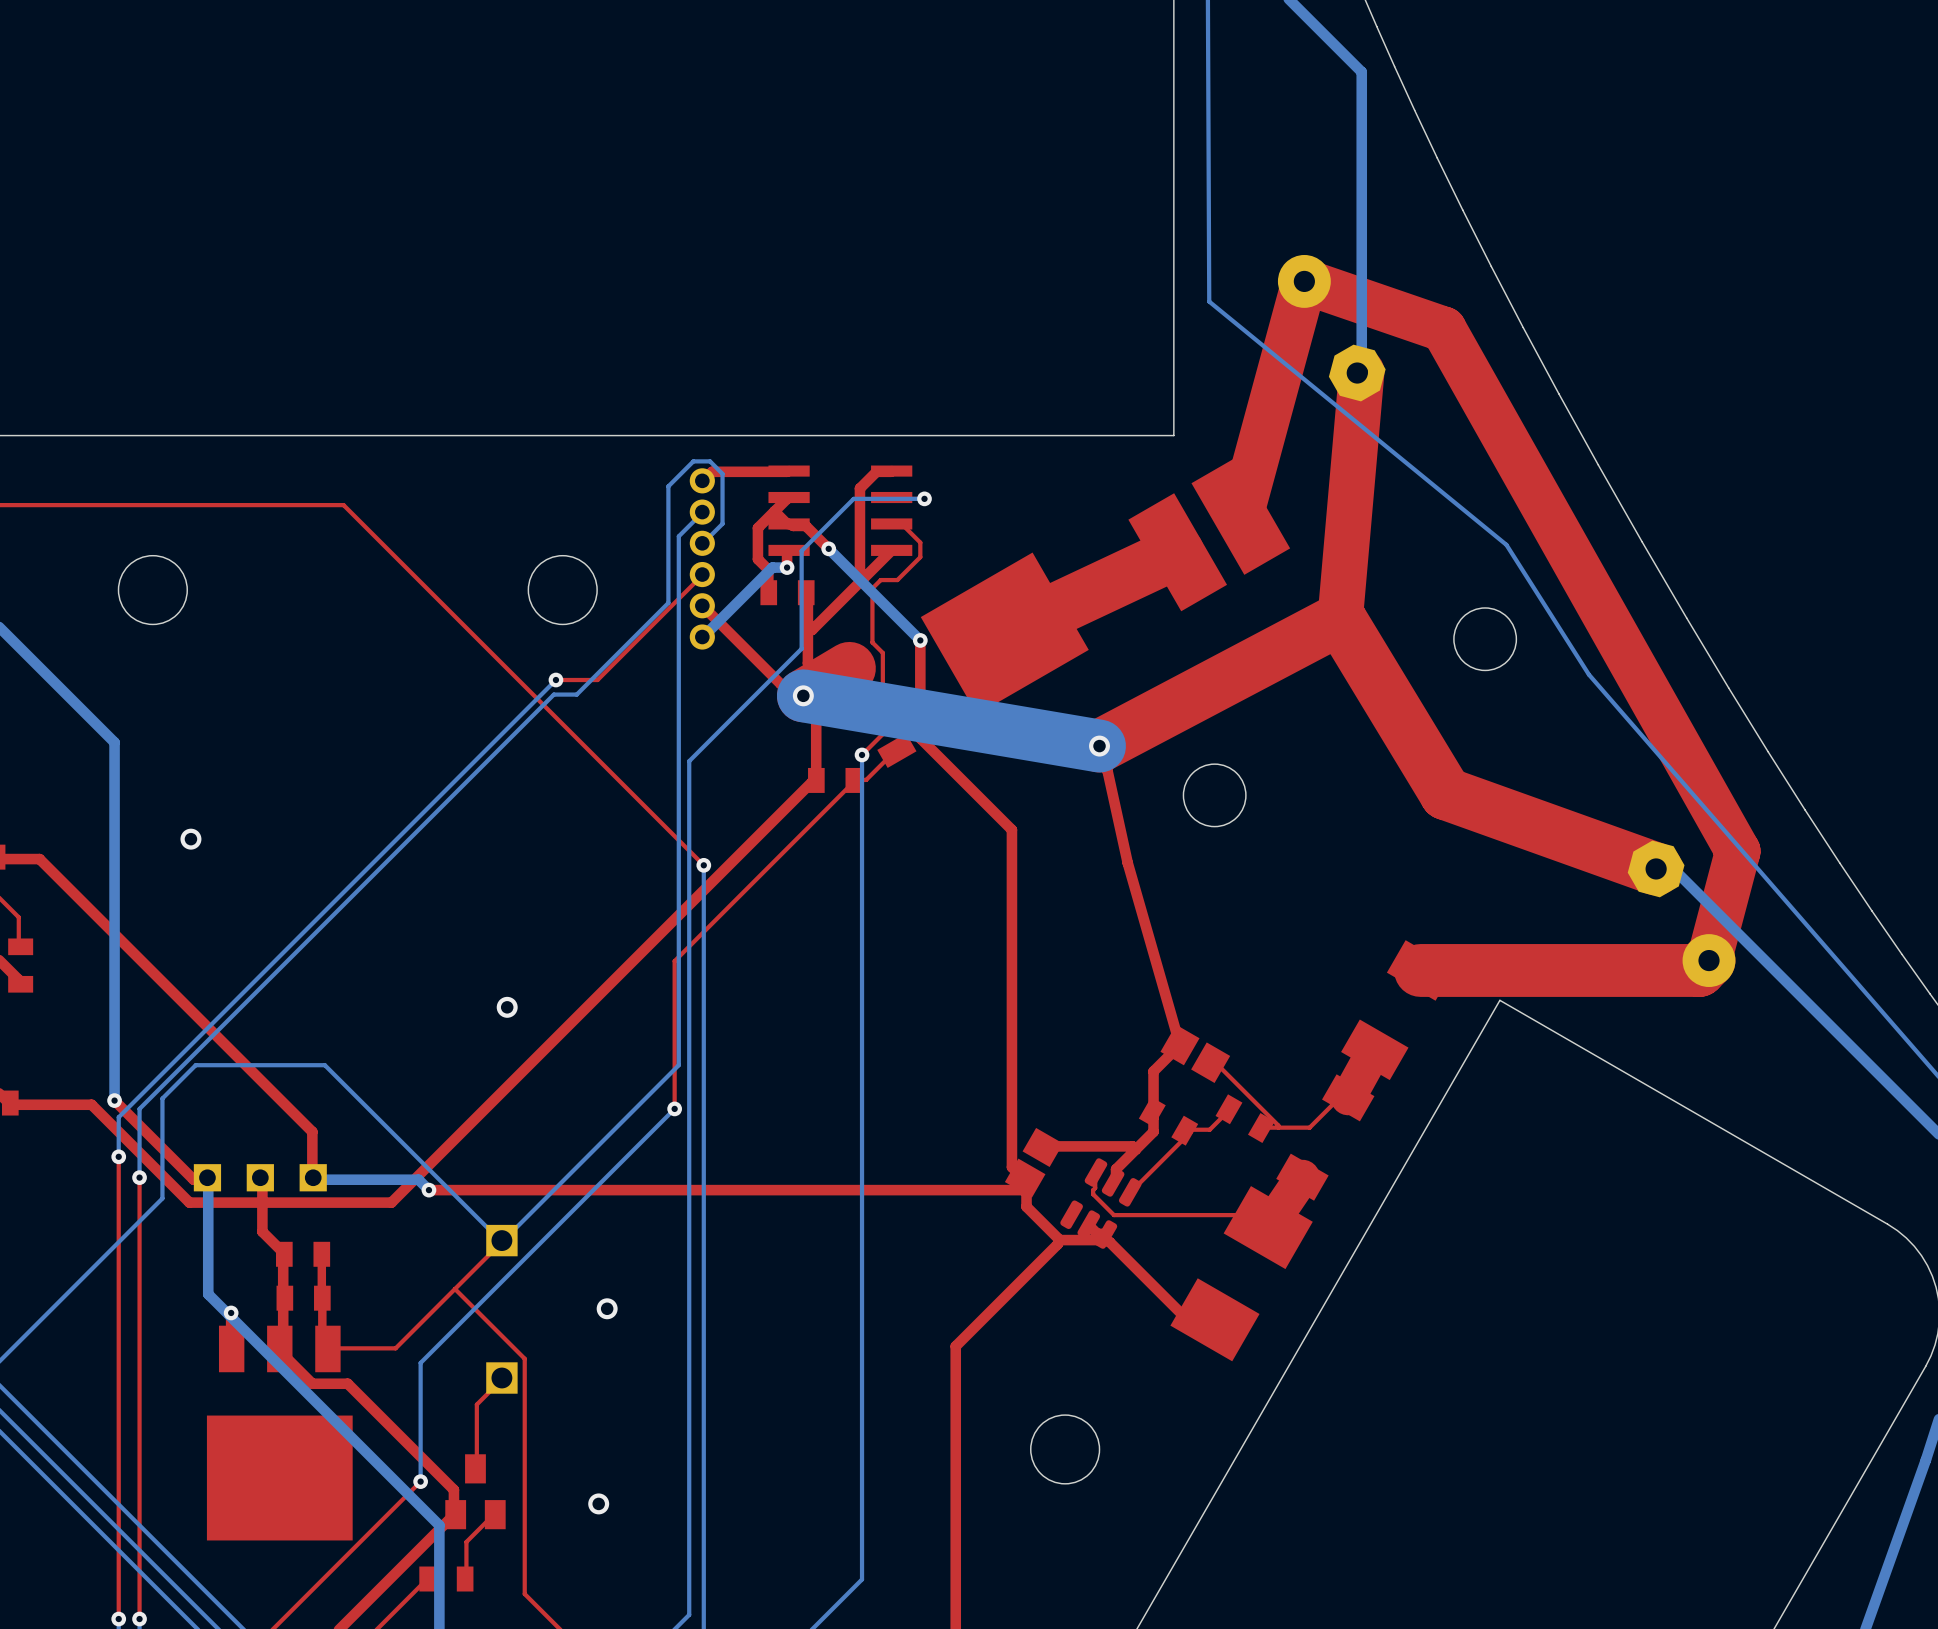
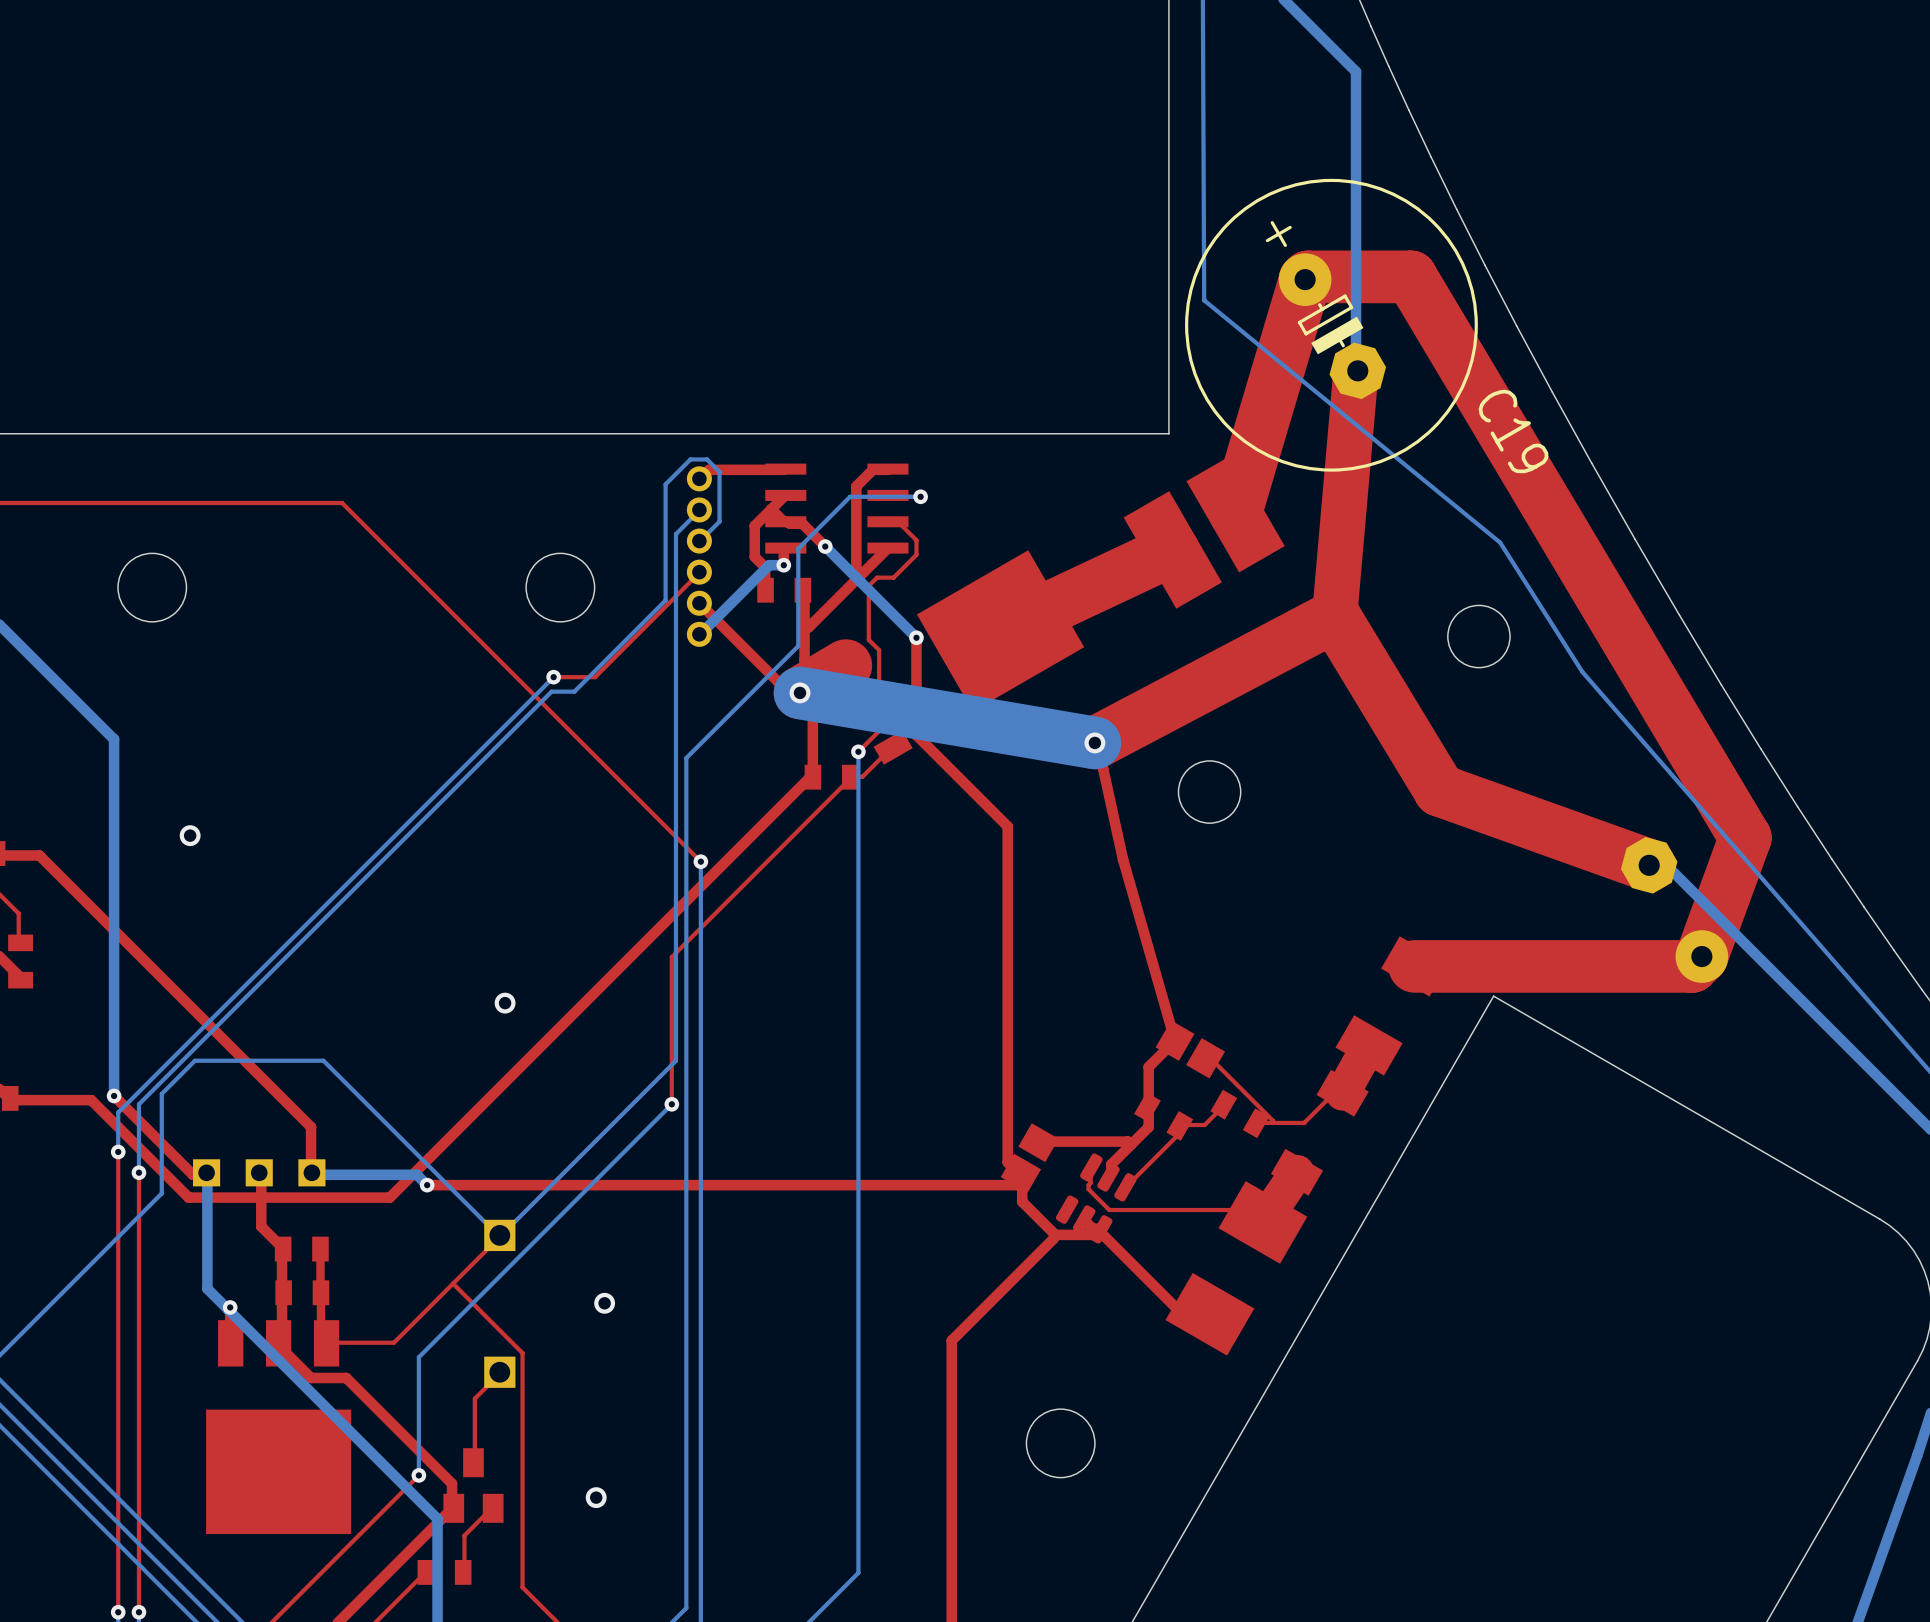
C19 side: top (1331, 328) -> bottom (1331, 325)
top track: (1240, 515) (1304, 281) (1443, 329) (1737, 851) (1709, 960) -> (1235, 513) (1305, 279) (1307, 276) (1410, 276) (1745, 837) (1701, 956)

